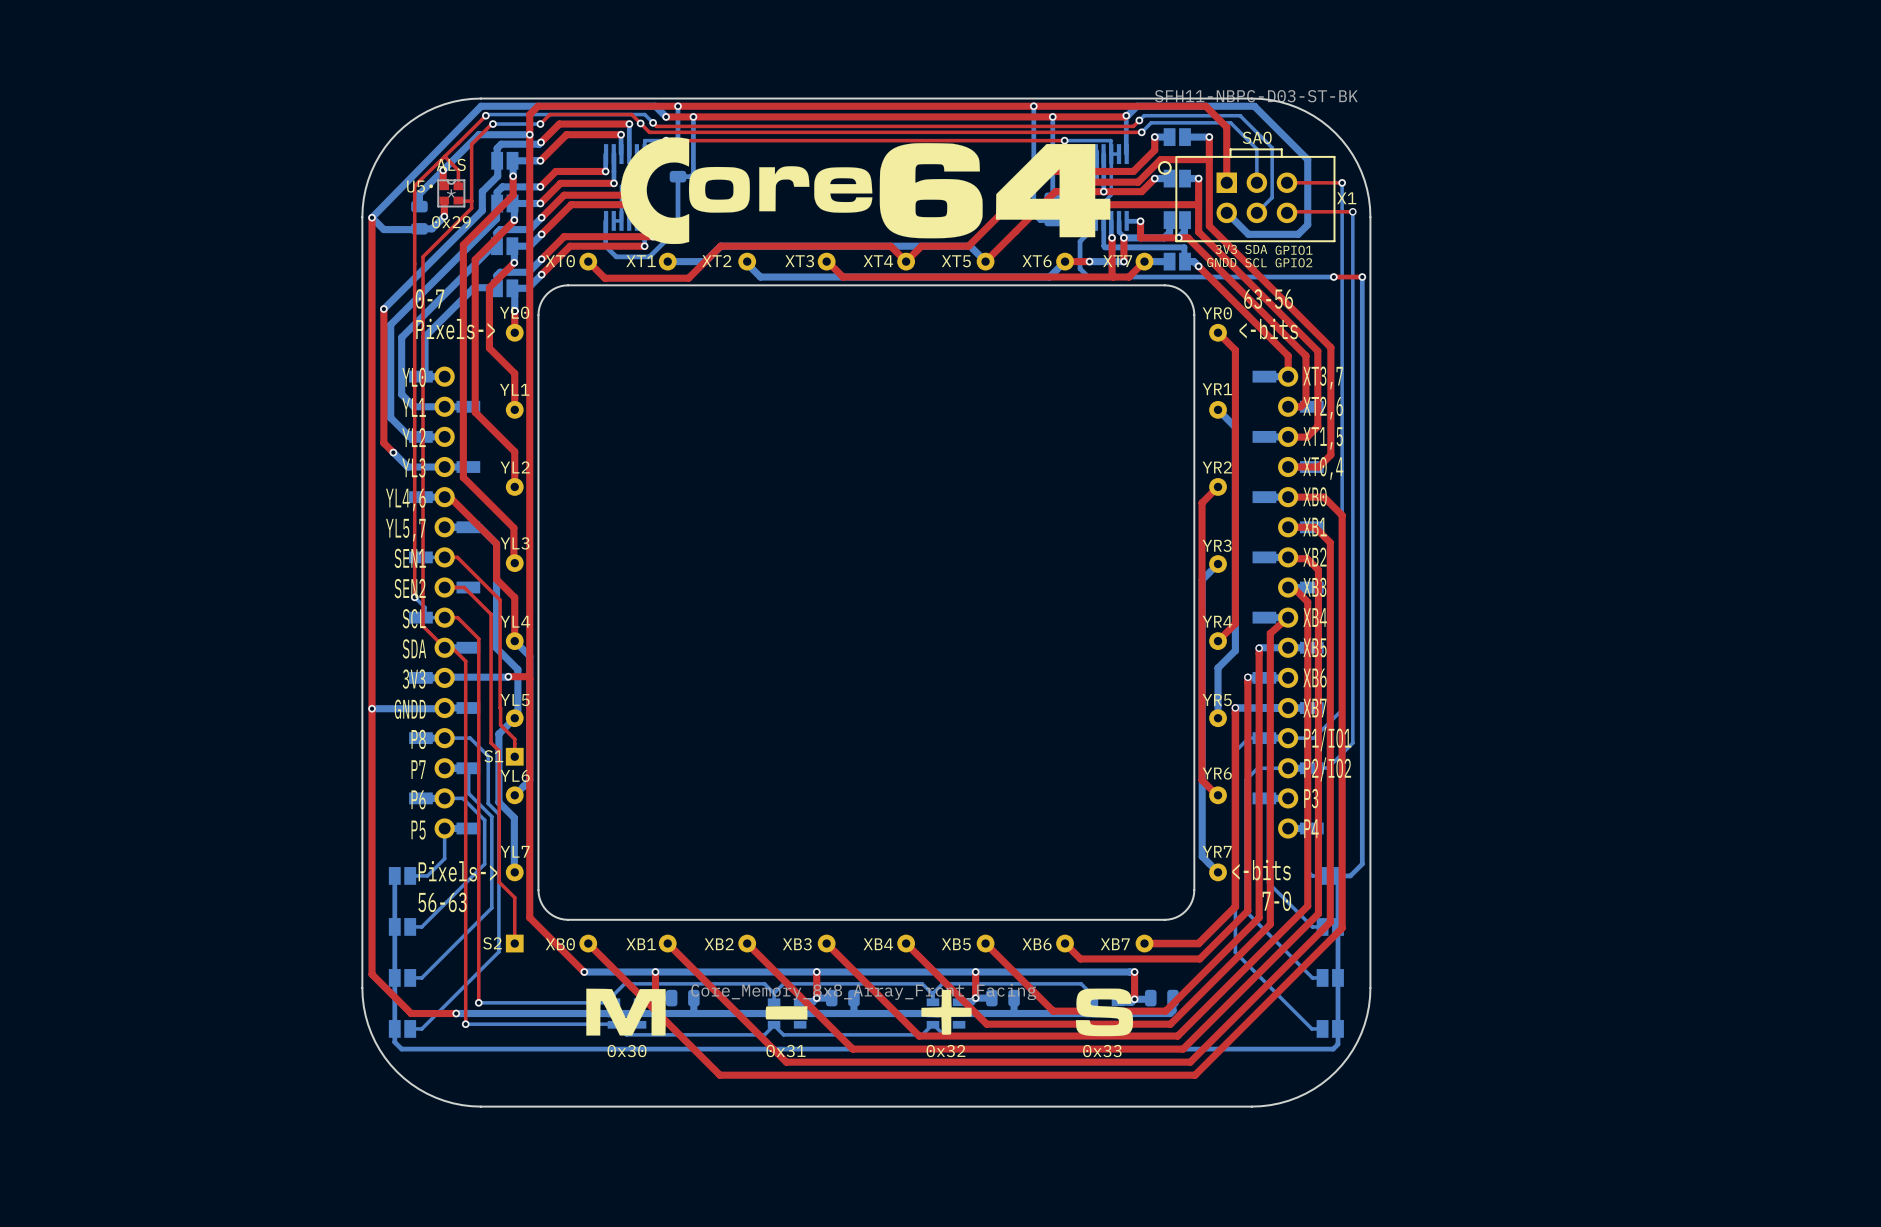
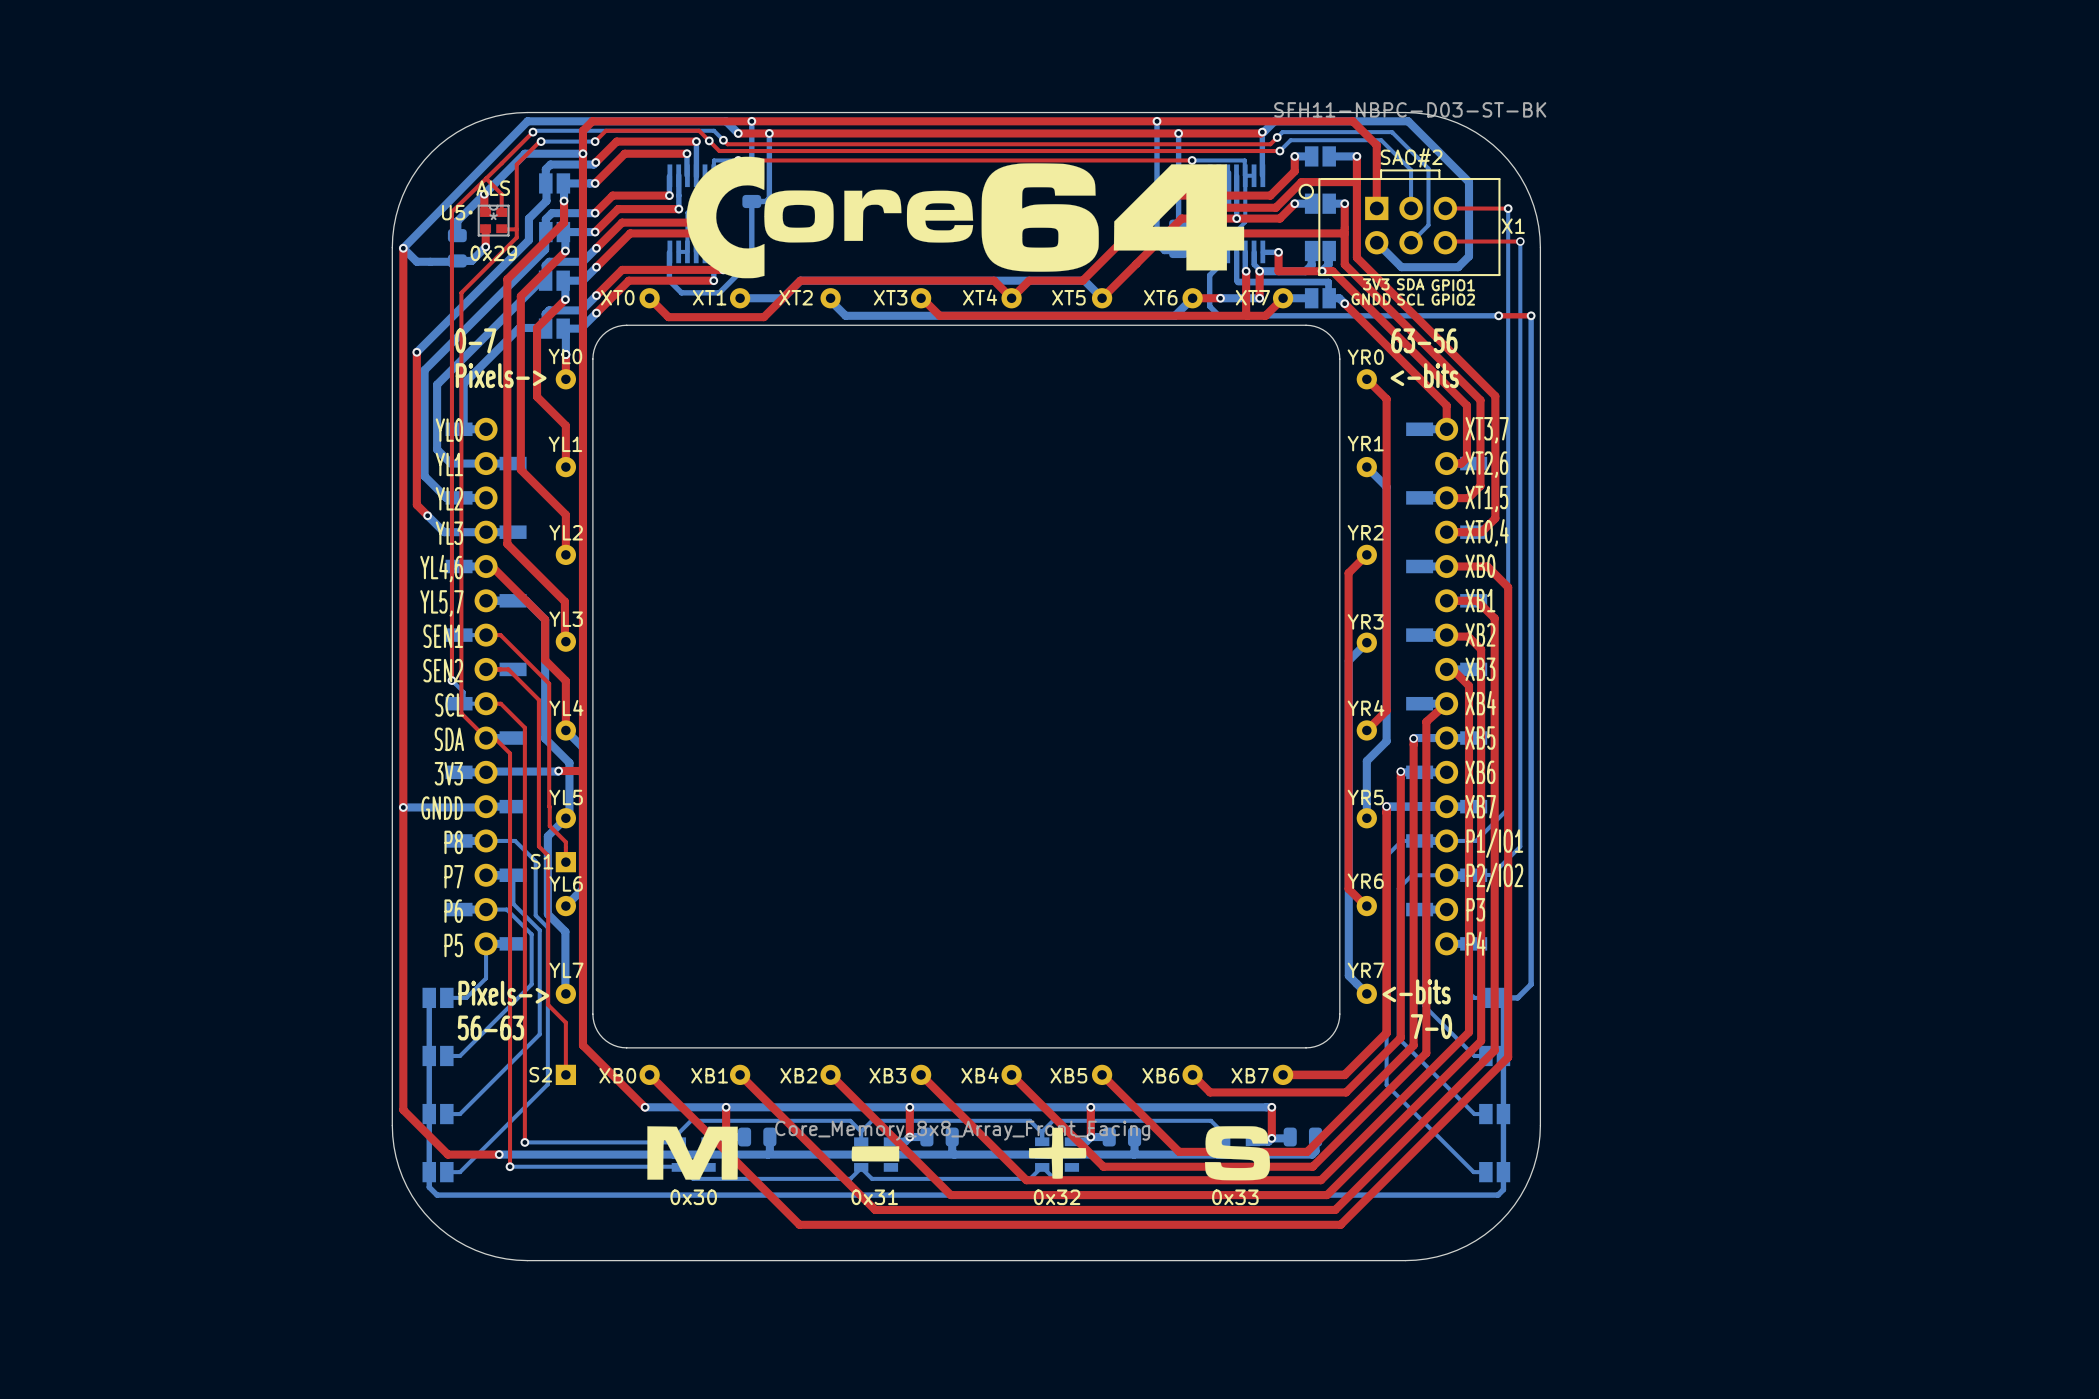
X1 text: SAO (1257, 137) -> SAO#2 (1411, 157)

